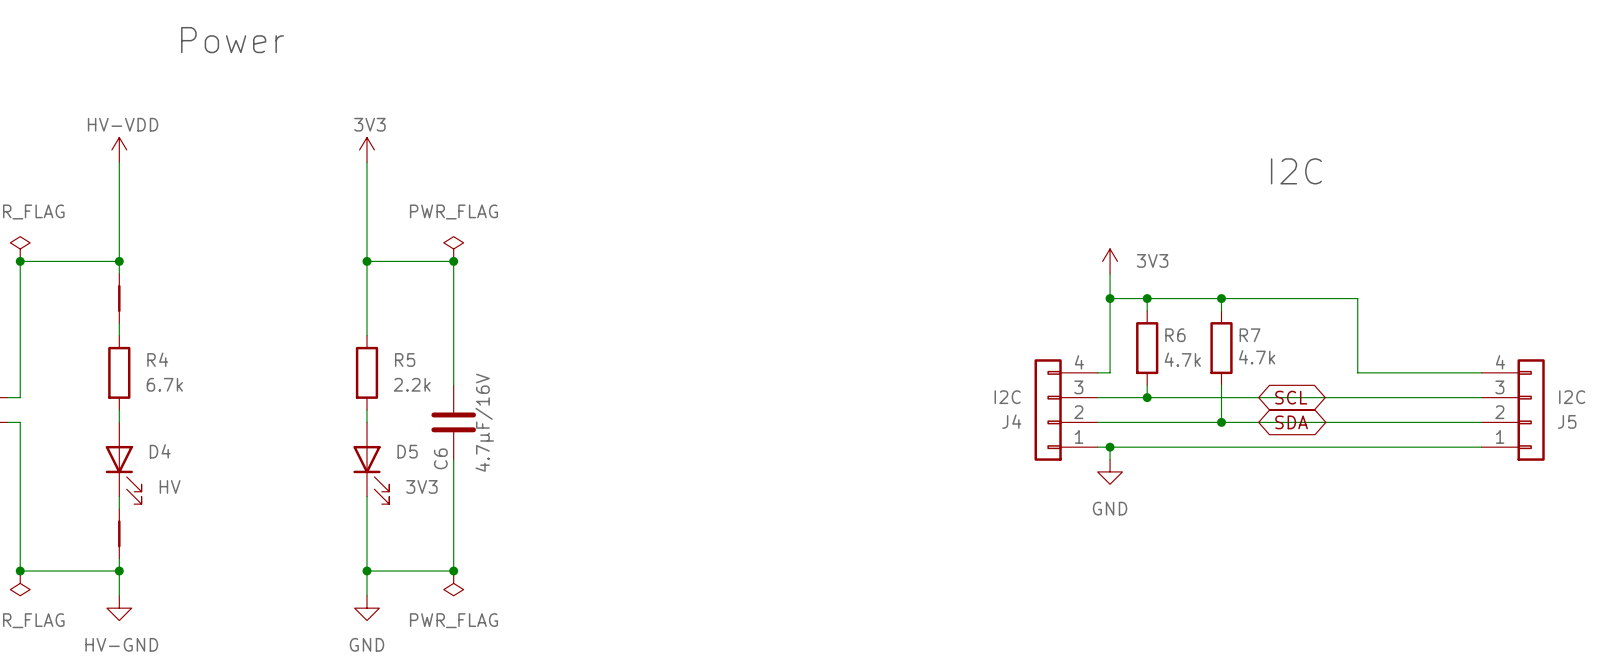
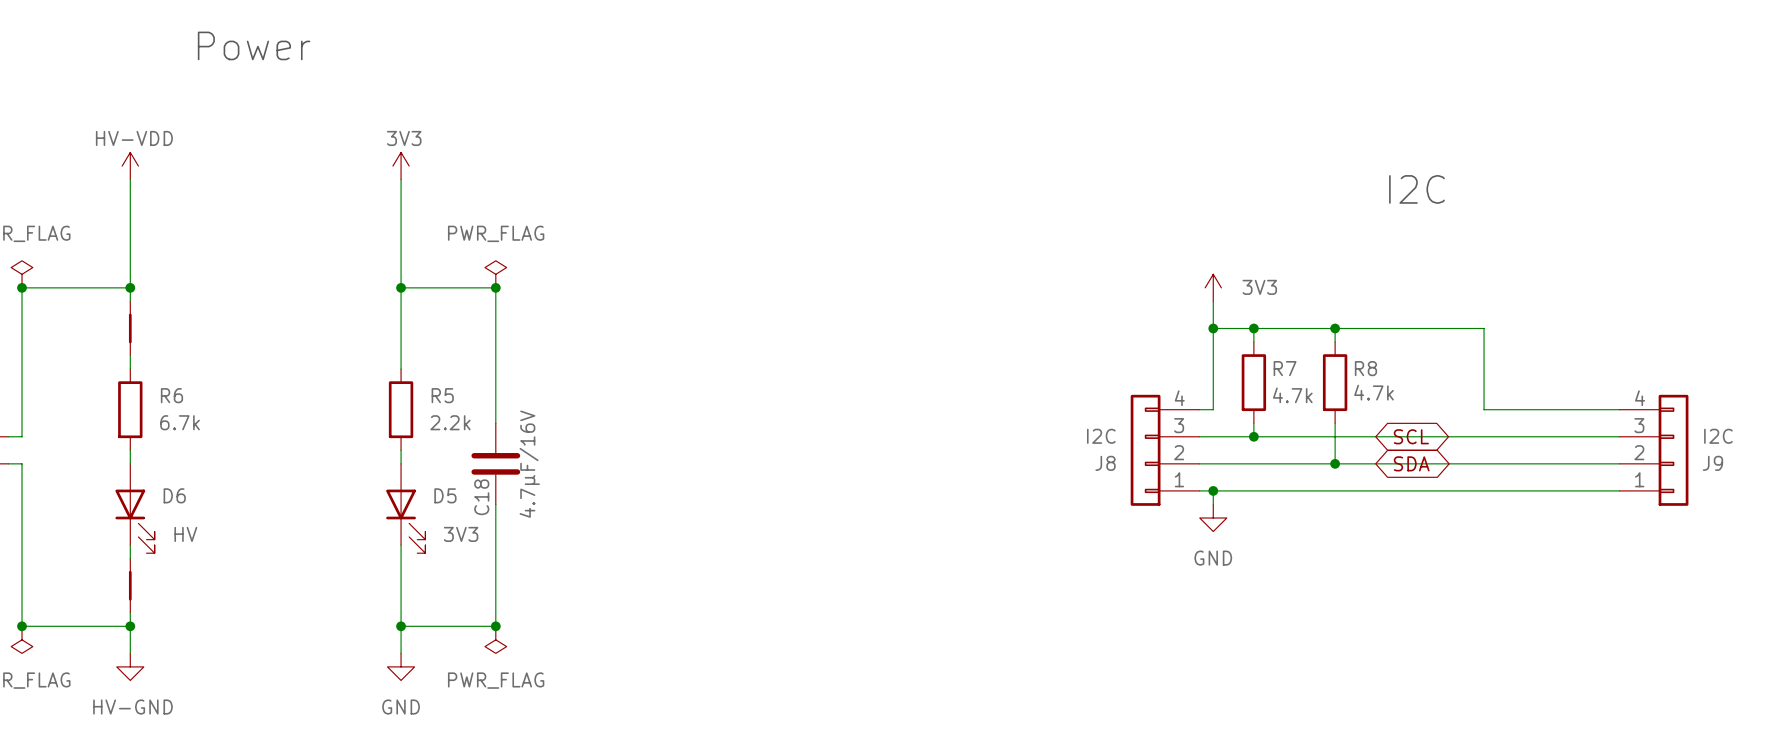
R6 name: R6 (1175, 335) -> R7 (1285, 368)
R7 name: R7 (1250, 335) -> R8 (1365, 368)
R4 name: R4 (157, 359) -> R6 (171, 395)
J4 name: J4 (1011, 421) -> J8 (1105, 463)
J5 name: J5 (1567, 421) -> J9 (1712, 463)
D4 name: D4 (160, 451) -> D6 (174, 495)
C6 name: C6 (440, 458) -> C18 (481, 497)

